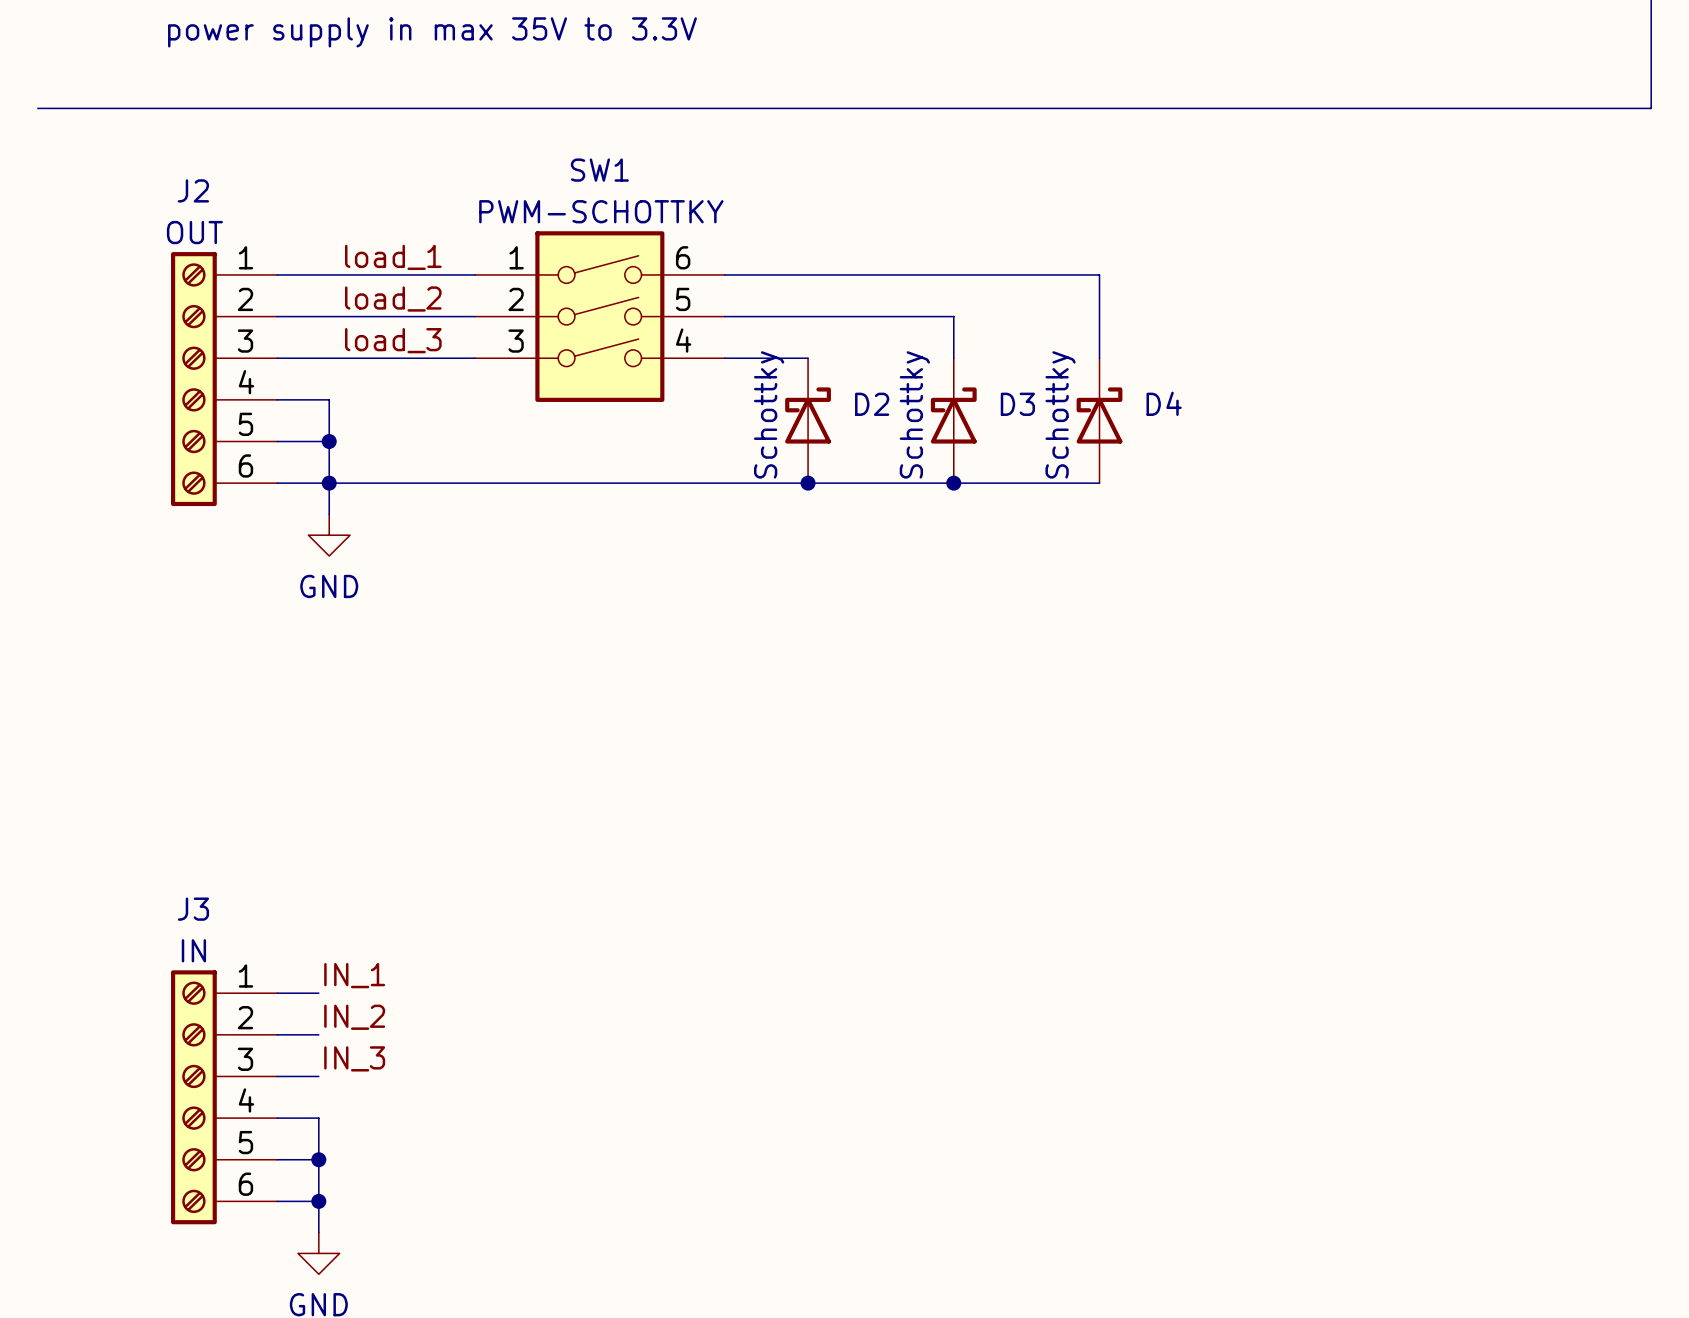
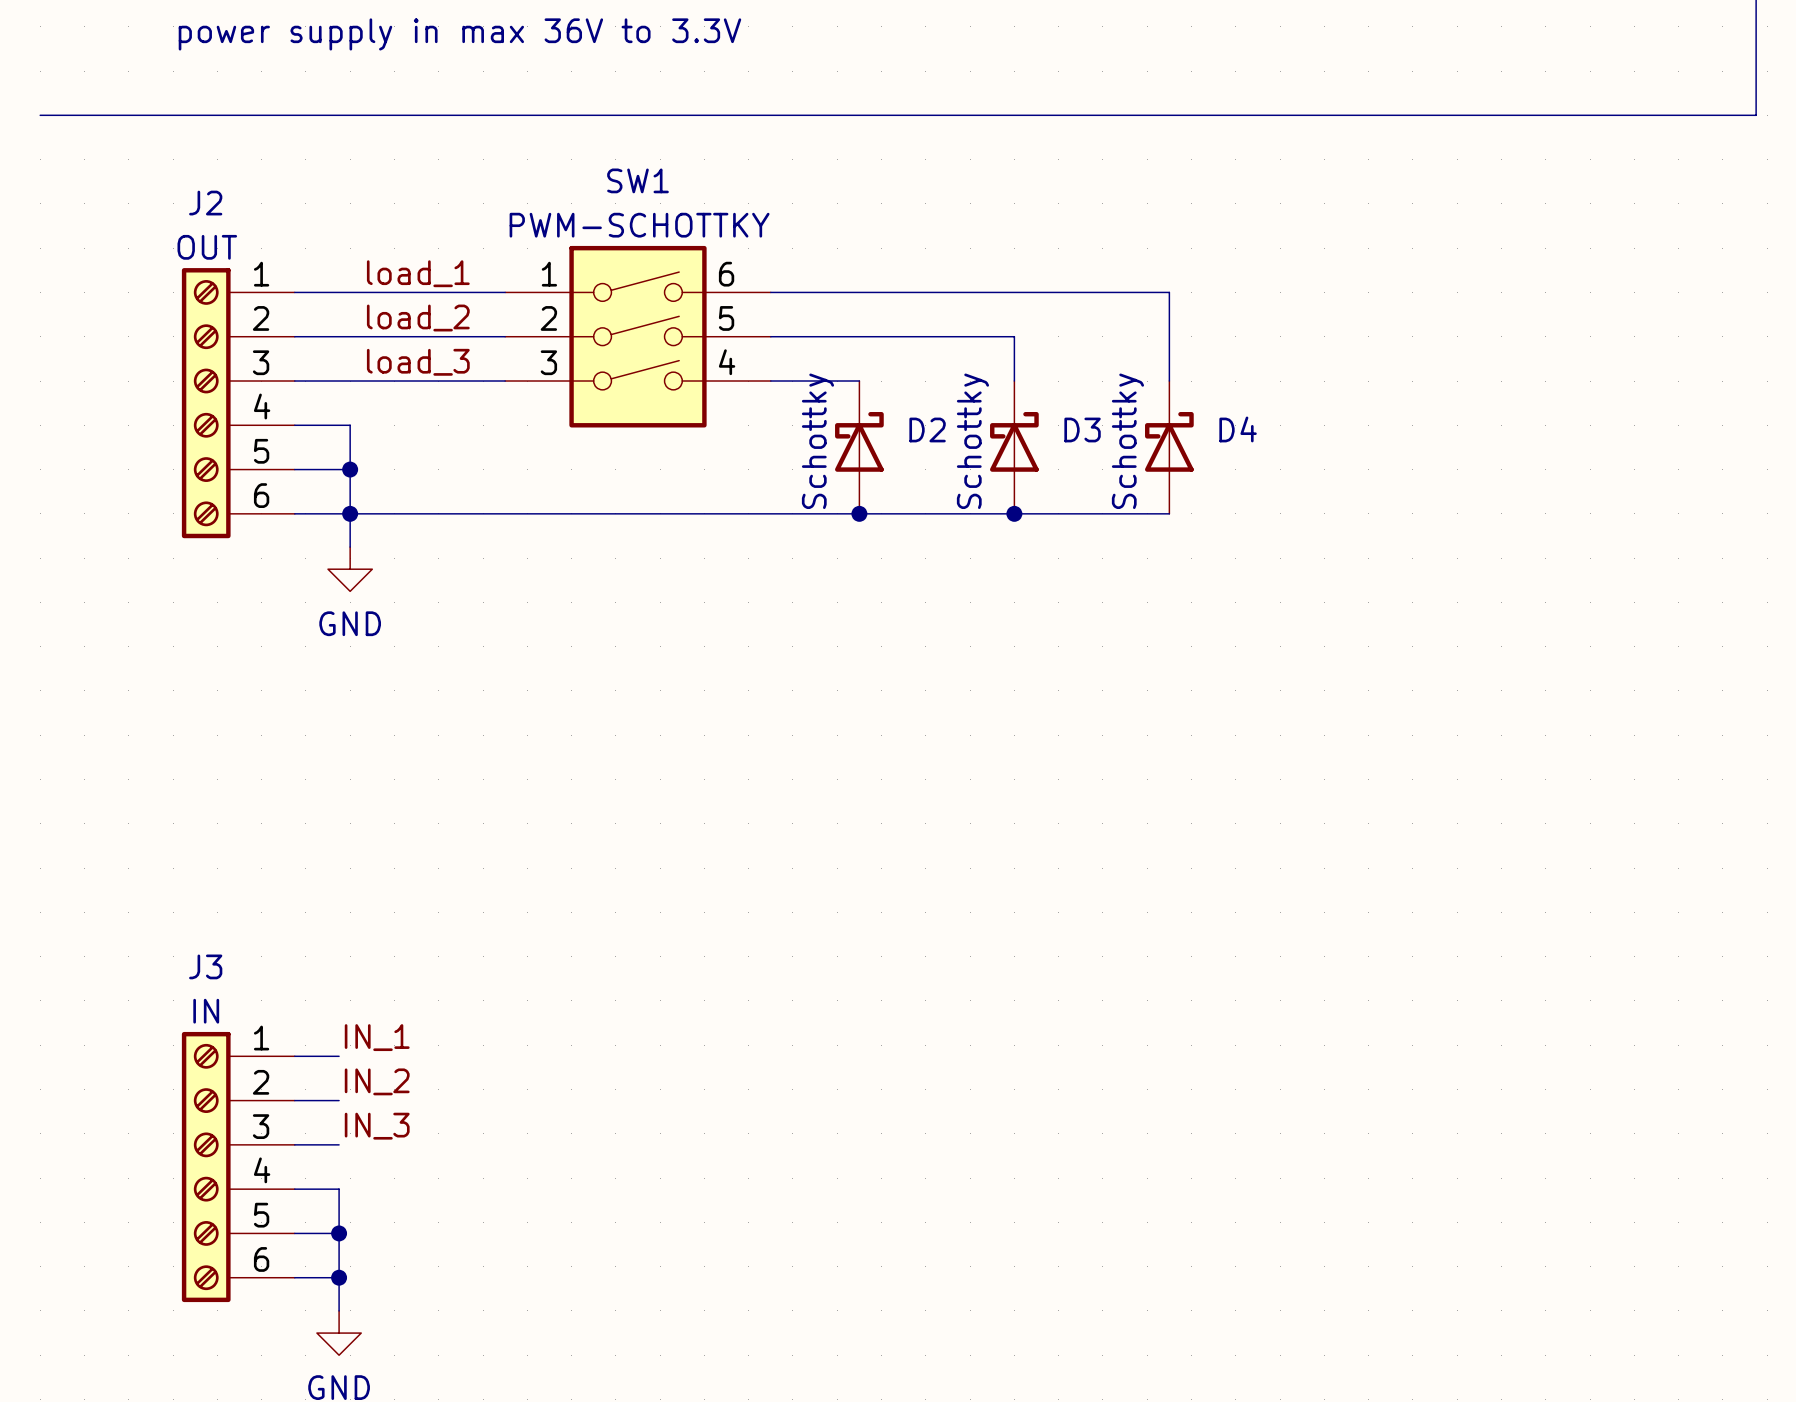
text: power supply in max 35V to 3.3V (432, 32) -> power supply in max 36V to 3.3V (459, 34)

